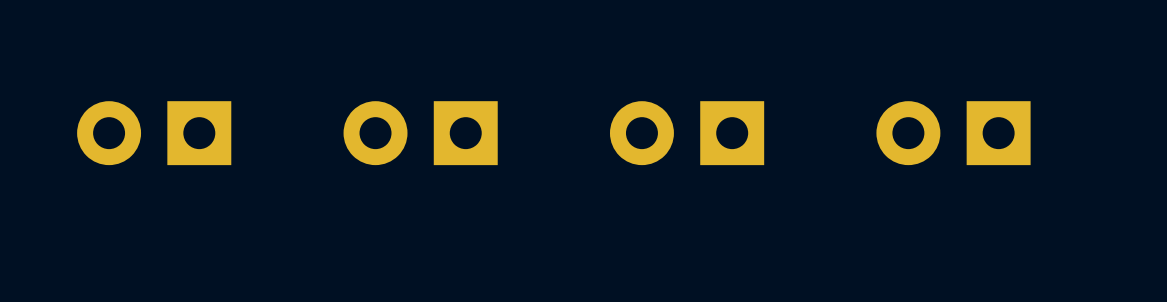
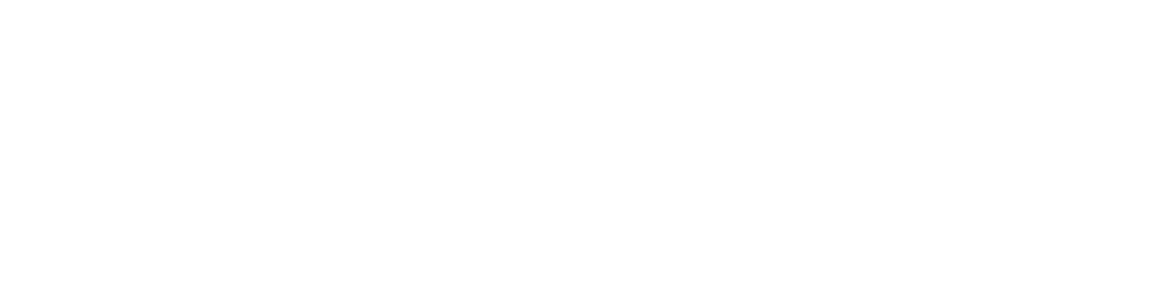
part: (154, 133) -> none
part: (420, 133) -> none
part: (687, 133) -> none
part: (953, 133) -> none

